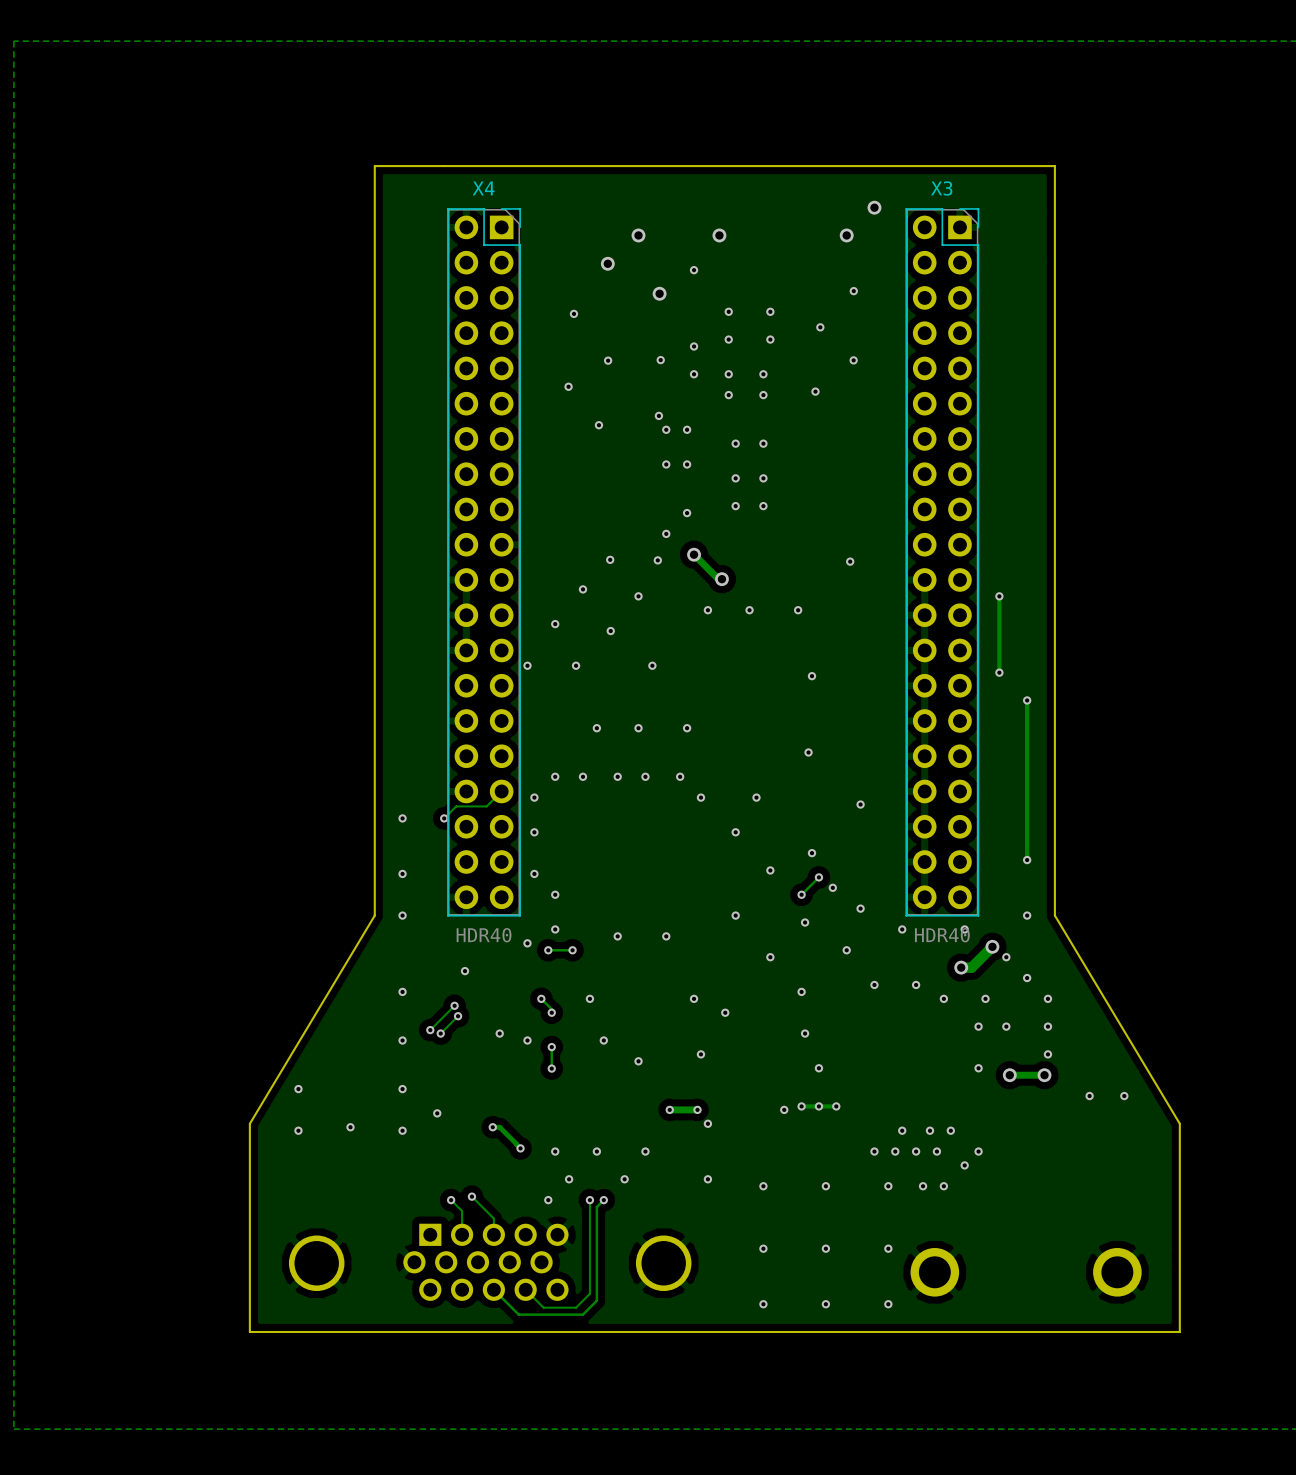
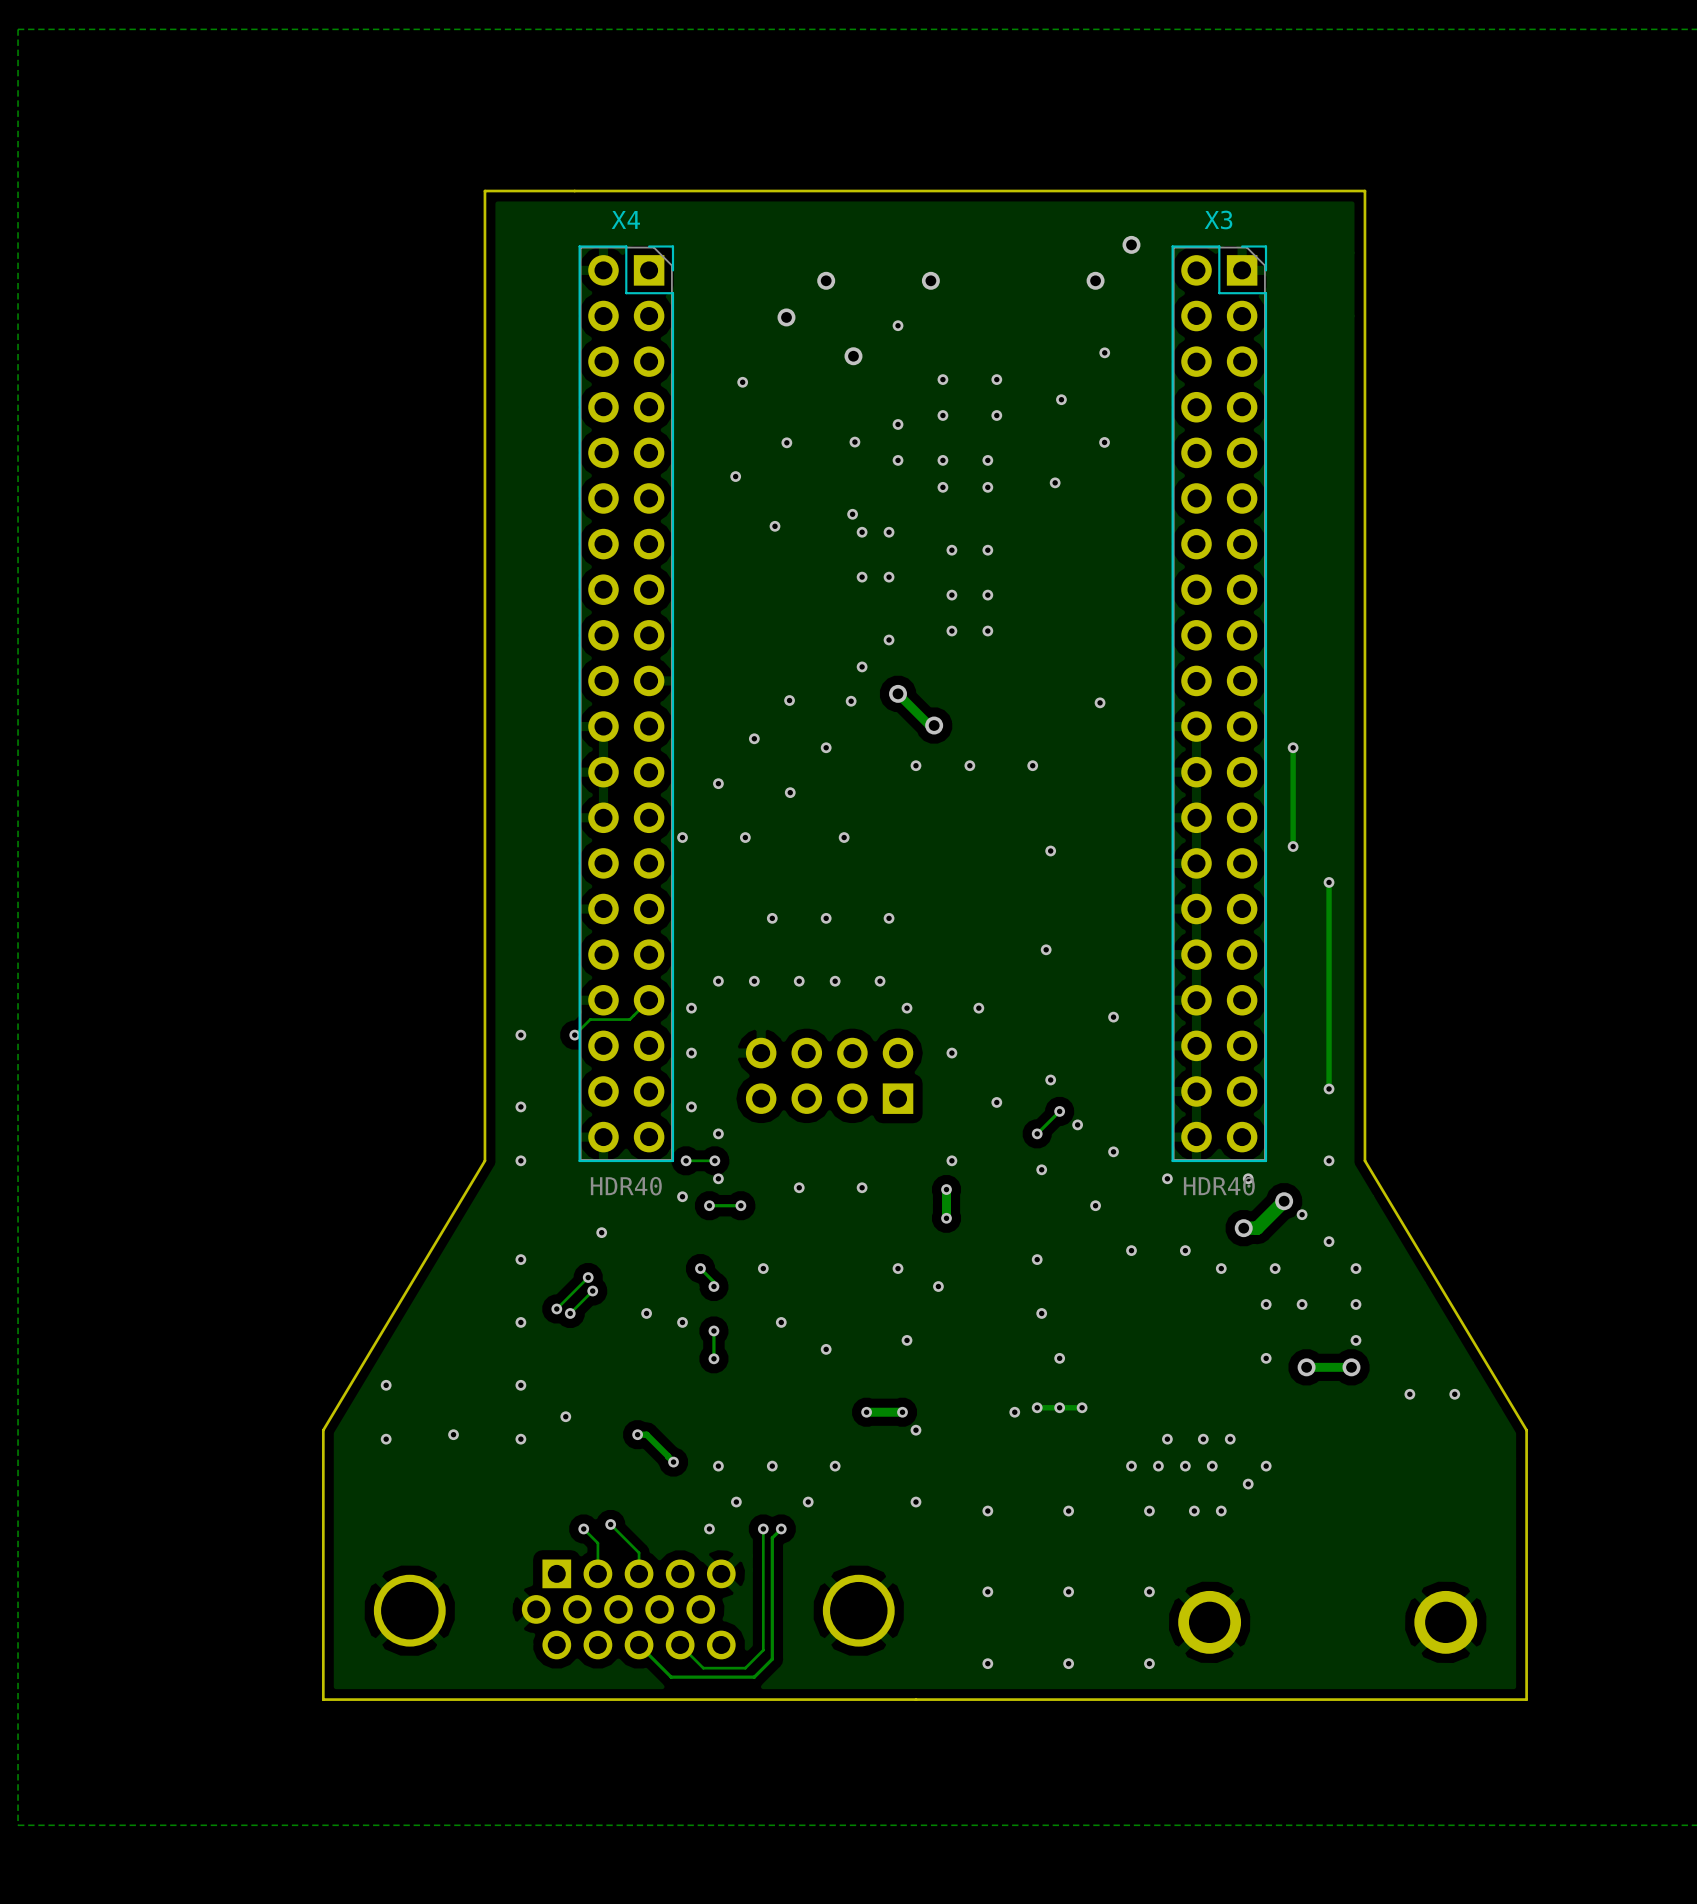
part: none -> (829, 1075)
via: none -> (686, 1160)
track: none -> (714, 1160) (686, 1160)
via: none -> (714, 1160)
track: none -> (946, 1189) (946, 1218)
via: none -> (946, 1189)
via: (770, 957) -> none
via: none -> (946, 1218)

